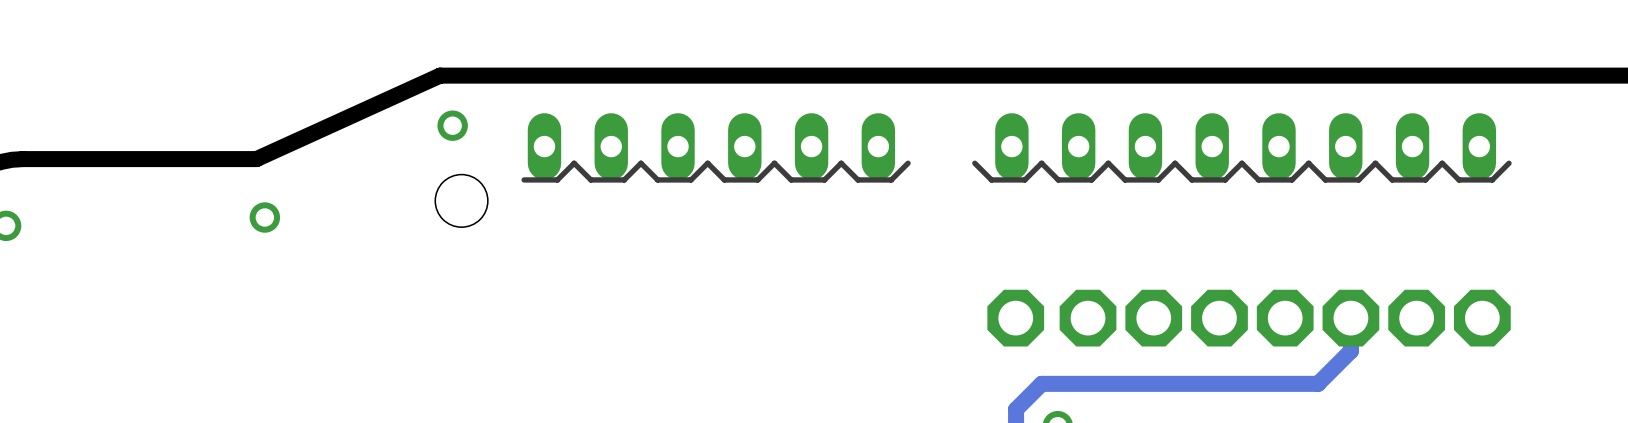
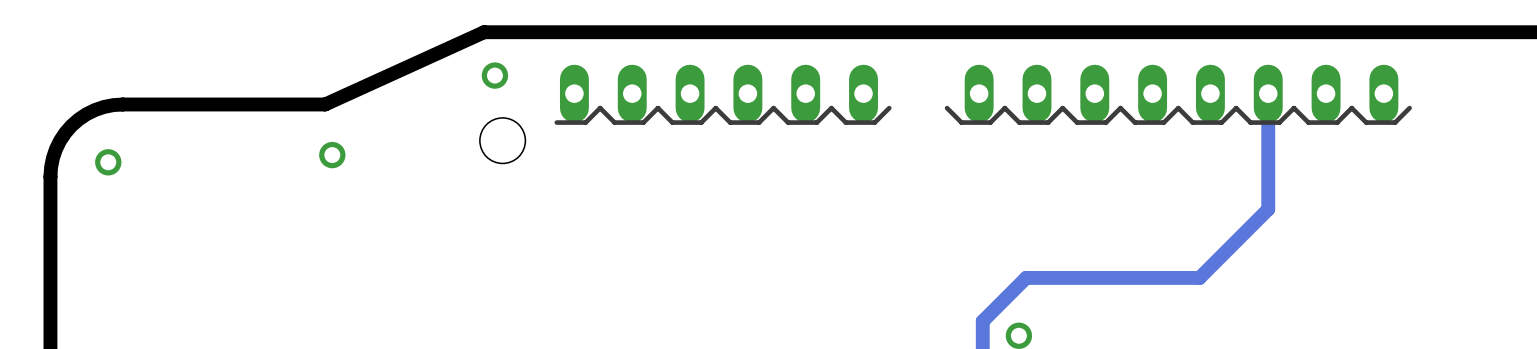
part: (1015, 318) -> none
part: (1088, 318) -> none
part: (1153, 318) -> none
part: (1219, 318) -> none
part: (1285, 318) -> none
track: (1350, 318) (1350, 350) (1318, 383) (1041, 383) -> (1268, 93) (1268, 209) (1199, 277) (1026, 277) (1004, 299)
part: (1350, 318) -> none
part: (1416, 318) -> none
part: (1482, 318) -> none

